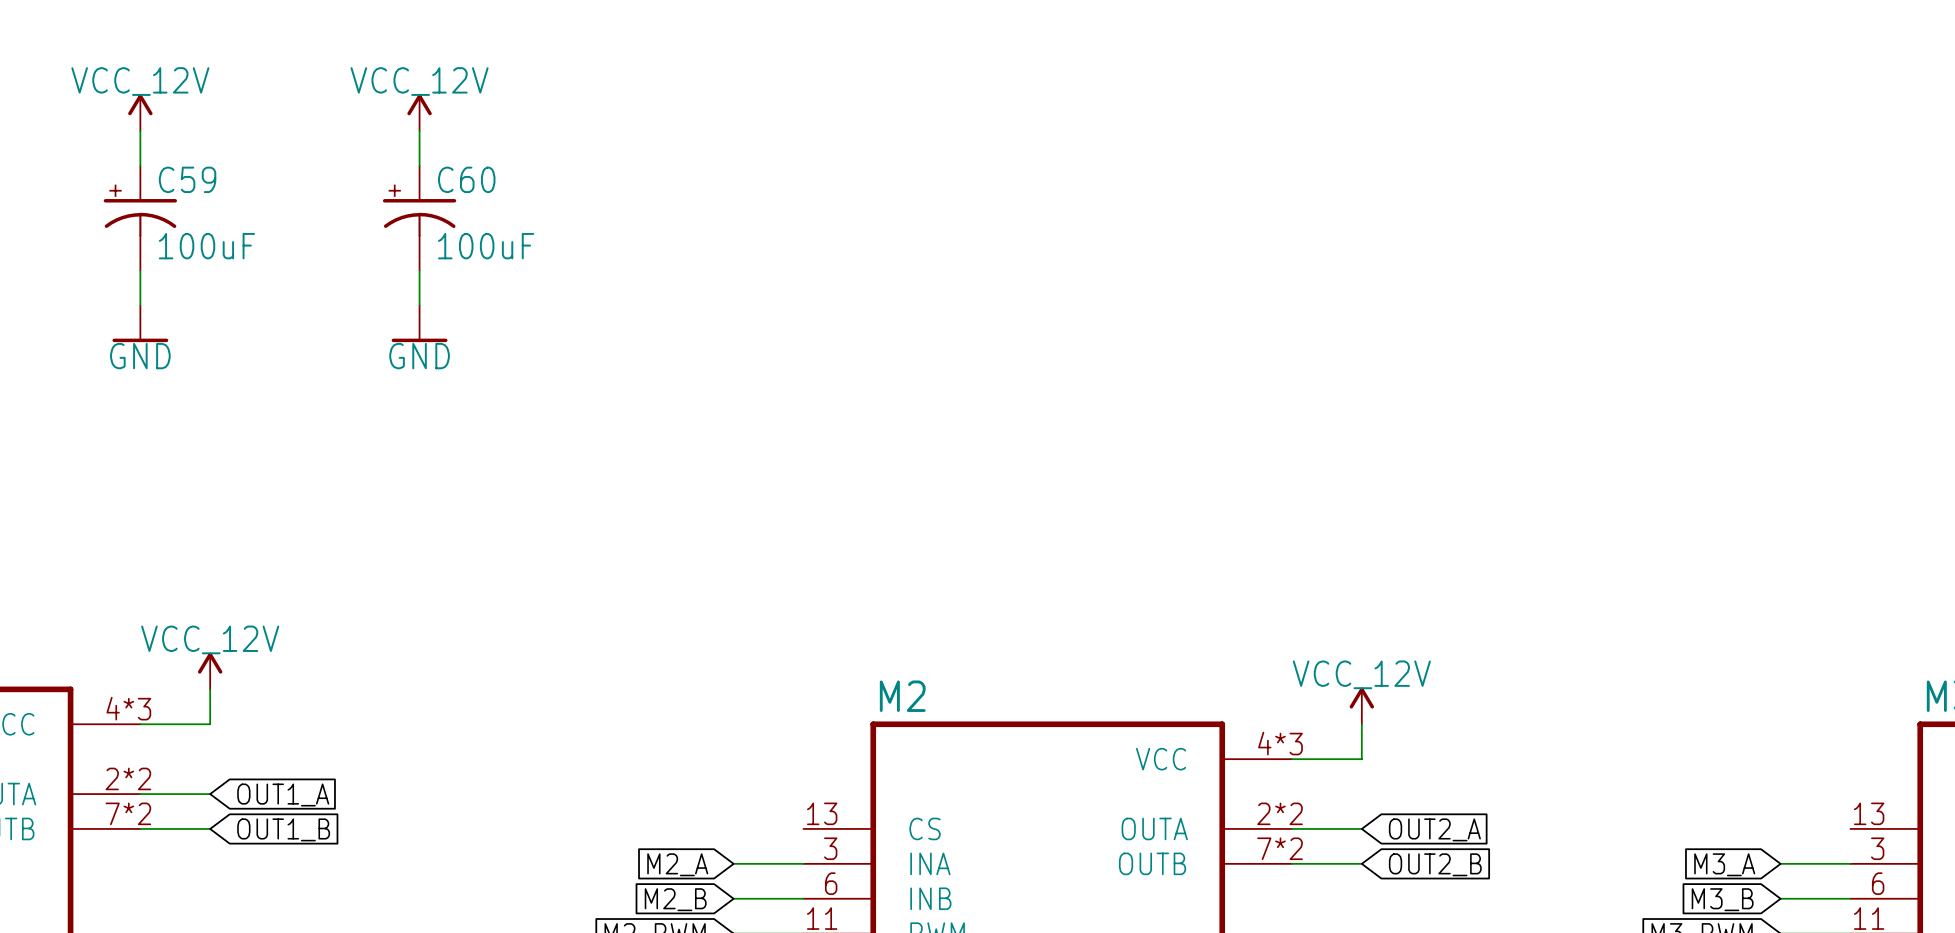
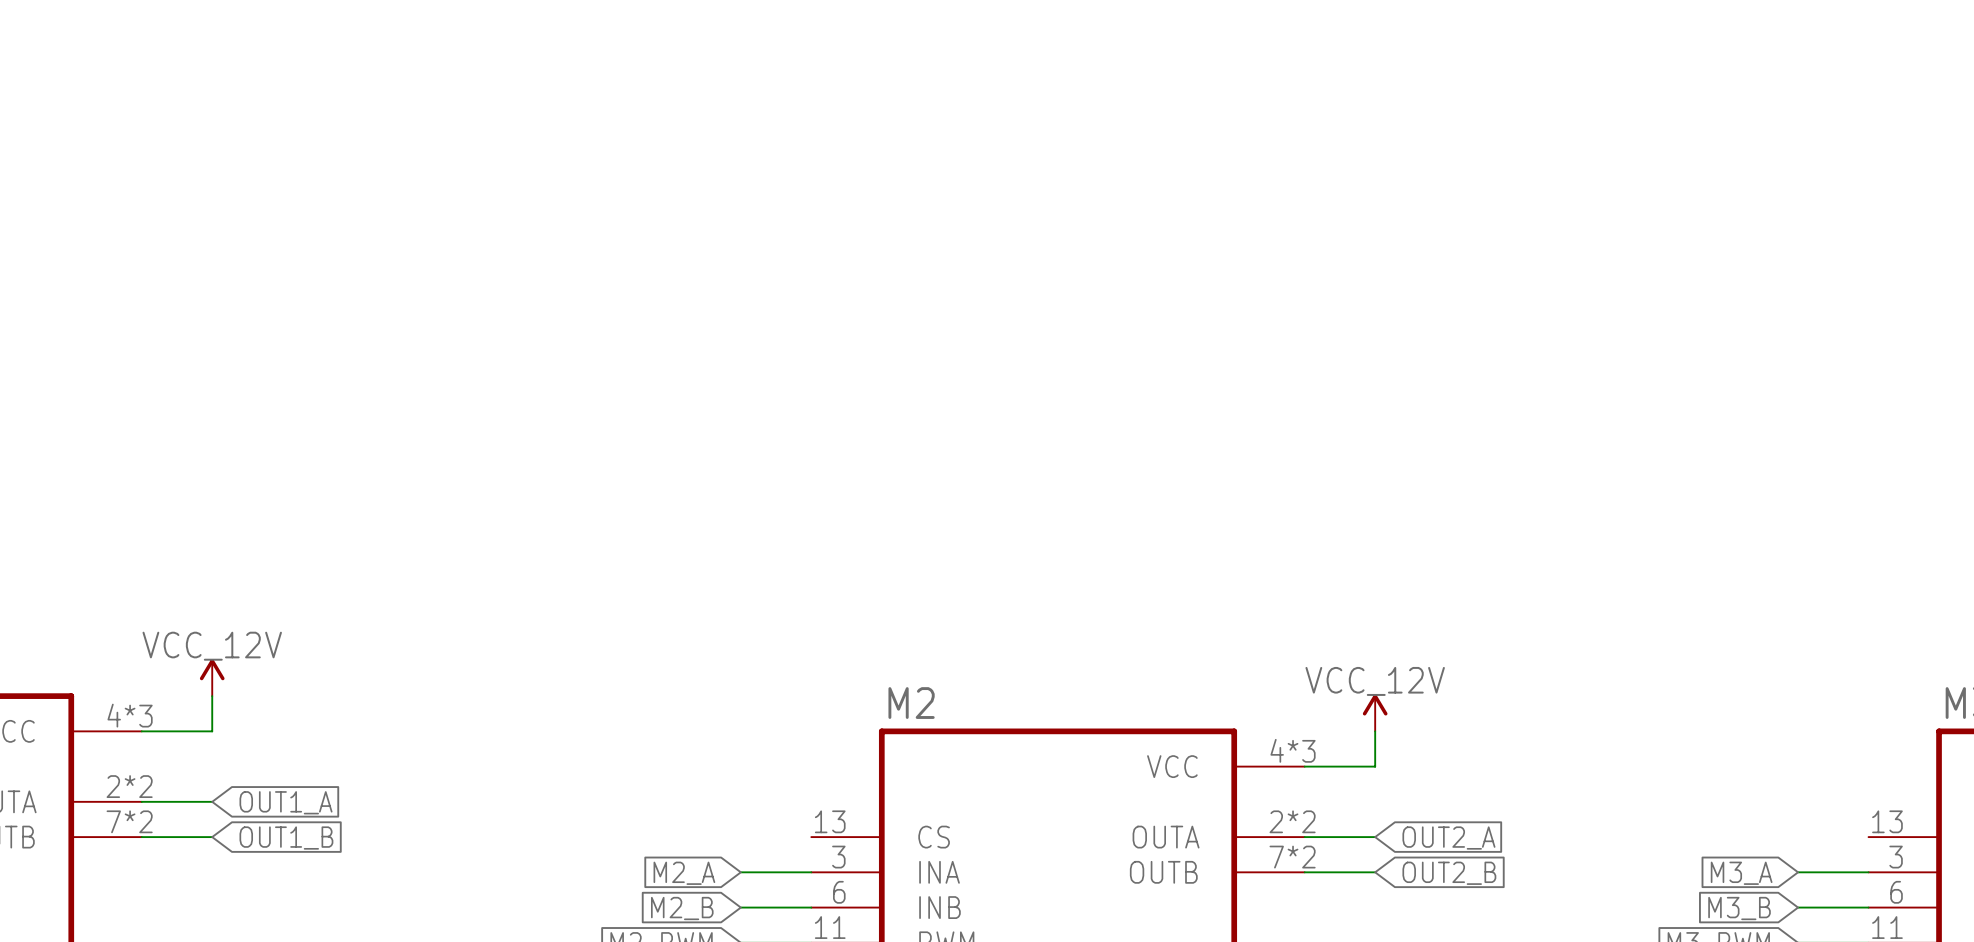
power symbol: VCC_12V (140, 112) -> none
power symbol: VCC_12V (419, 112) -> none
wire: (140, 130) (140, 165) -> none
wire: (419, 130) (419, 165) -> none
C59: 100uF (140, 218) -> none
C60: 100uF (419, 218) -> none
wire: (140, 270) (140, 305) -> none
wire: (419, 270) (419, 305) -> none
power symbol: GND (140, 323) -> none
power symbol: GND (419, 323) -> none

